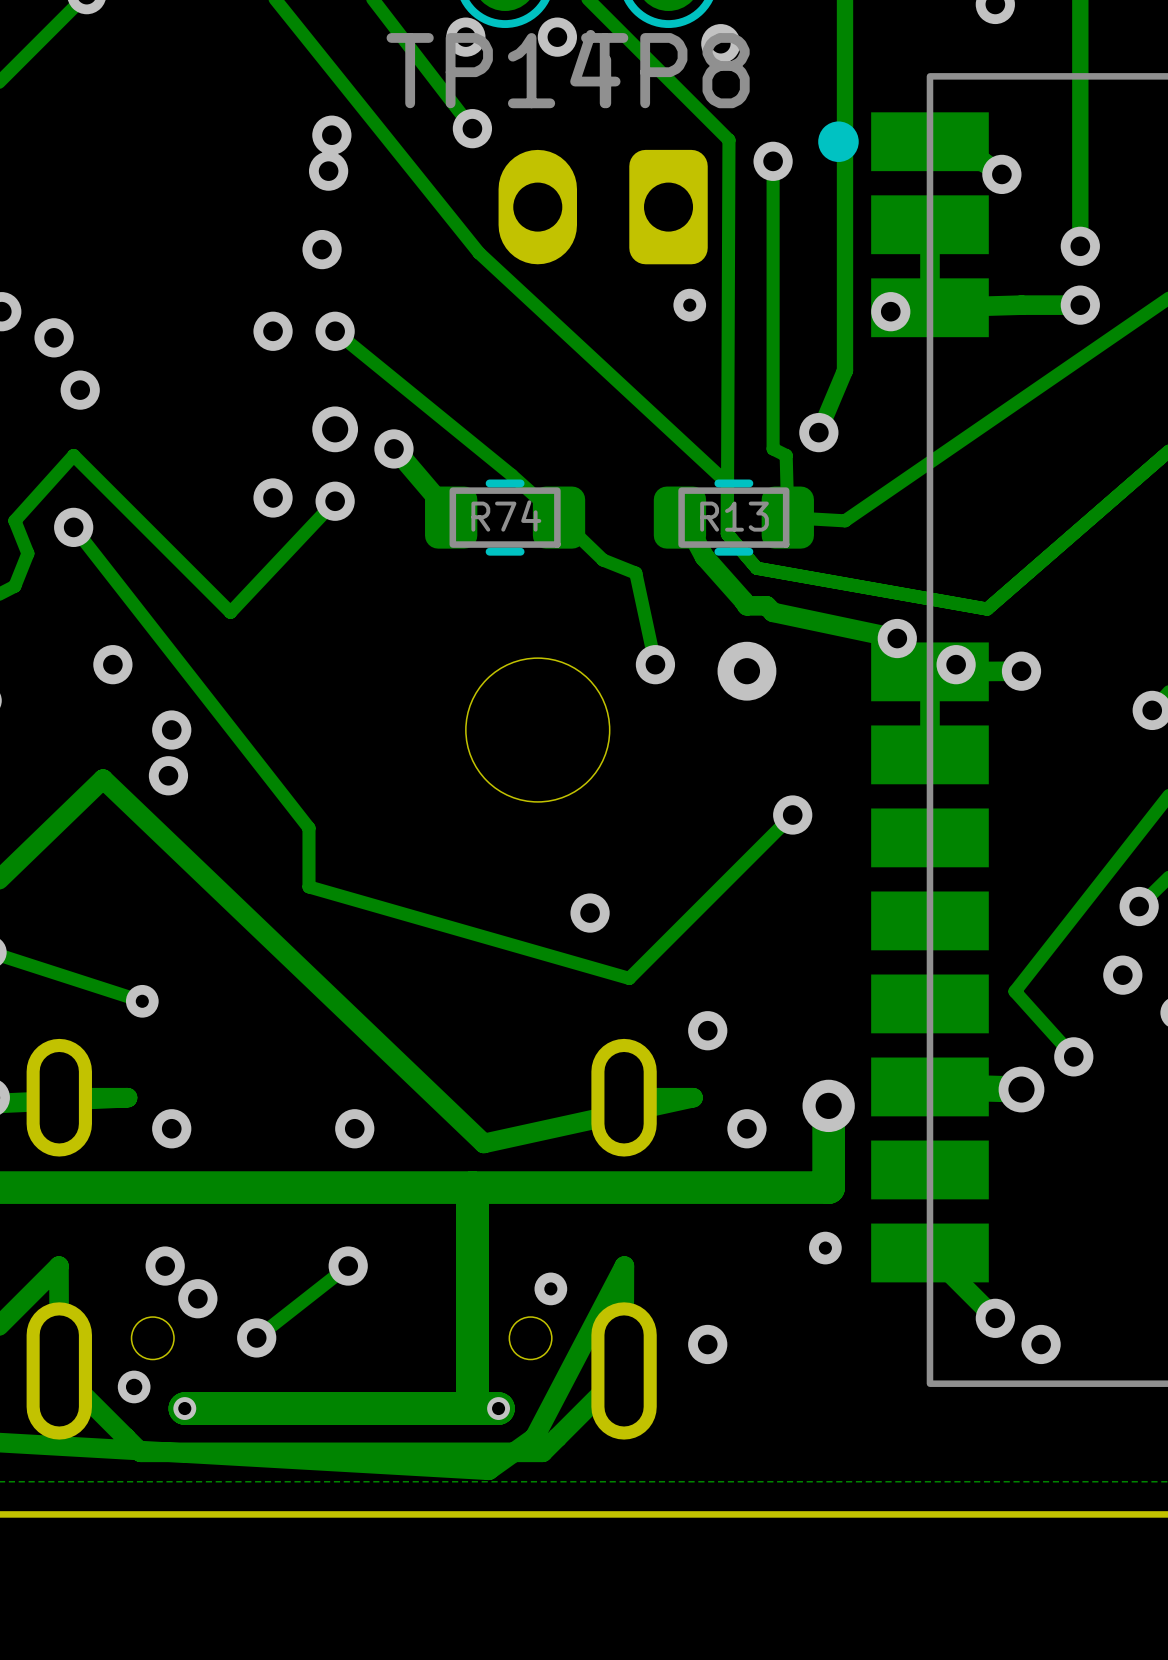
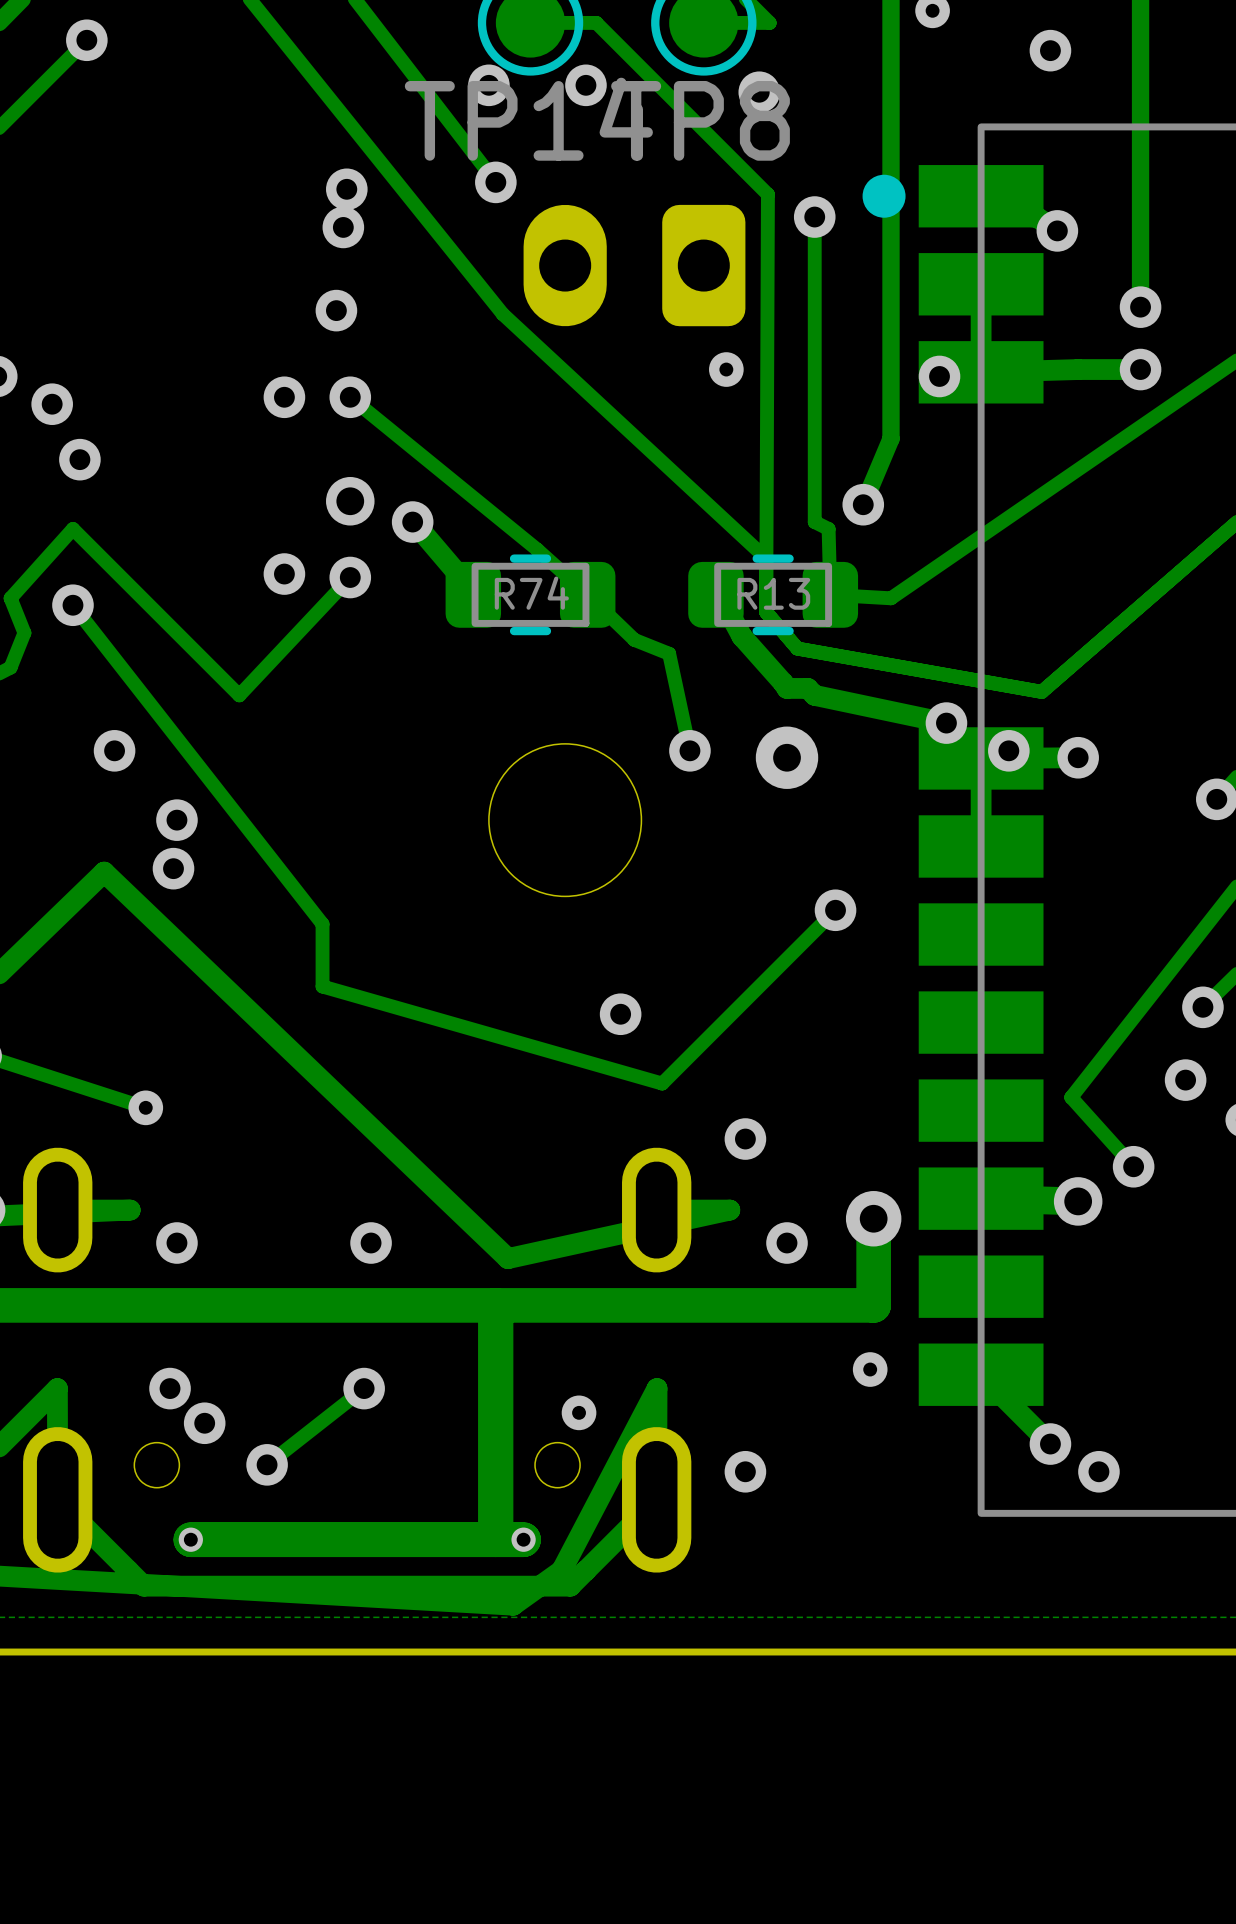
via: (134, 1386) -> none

